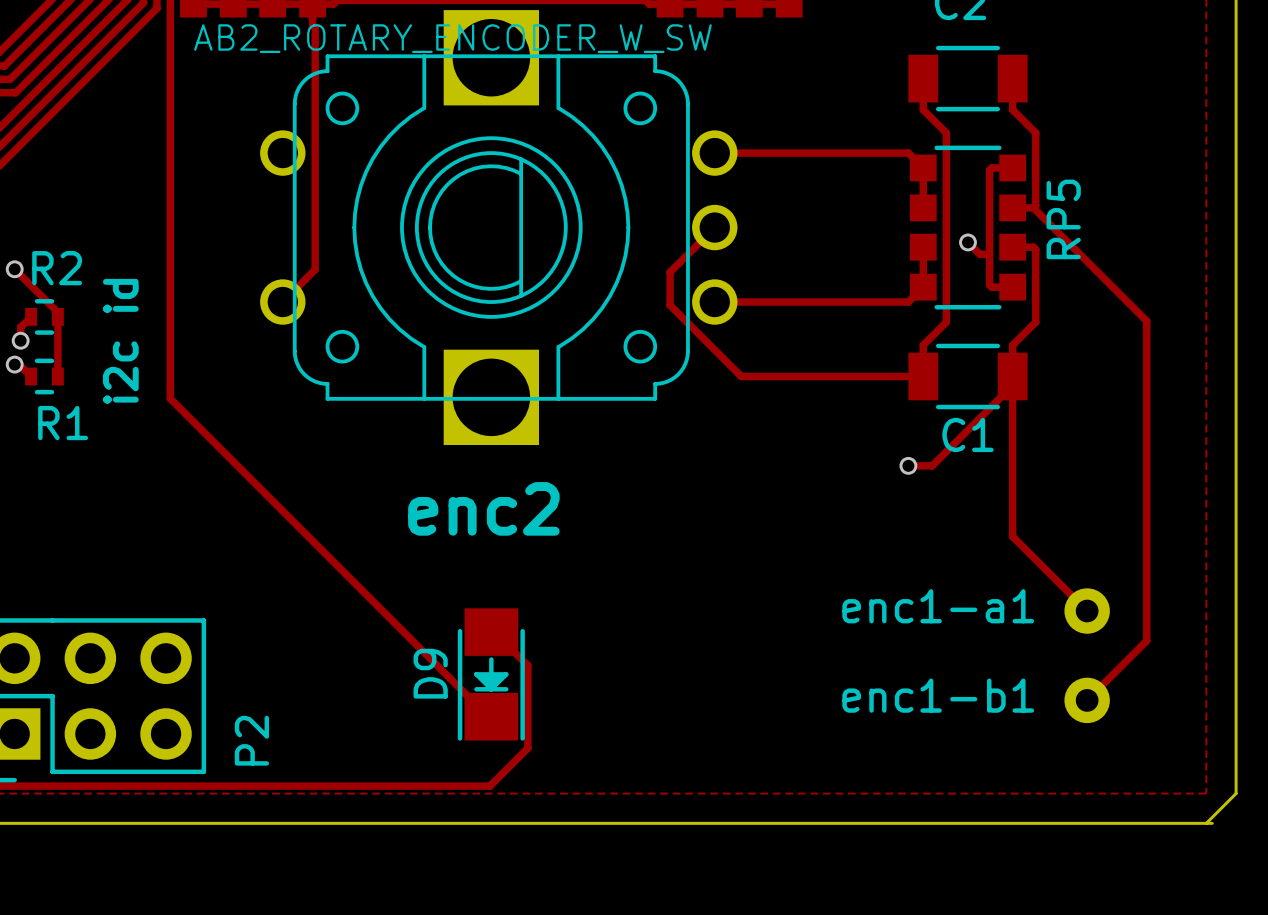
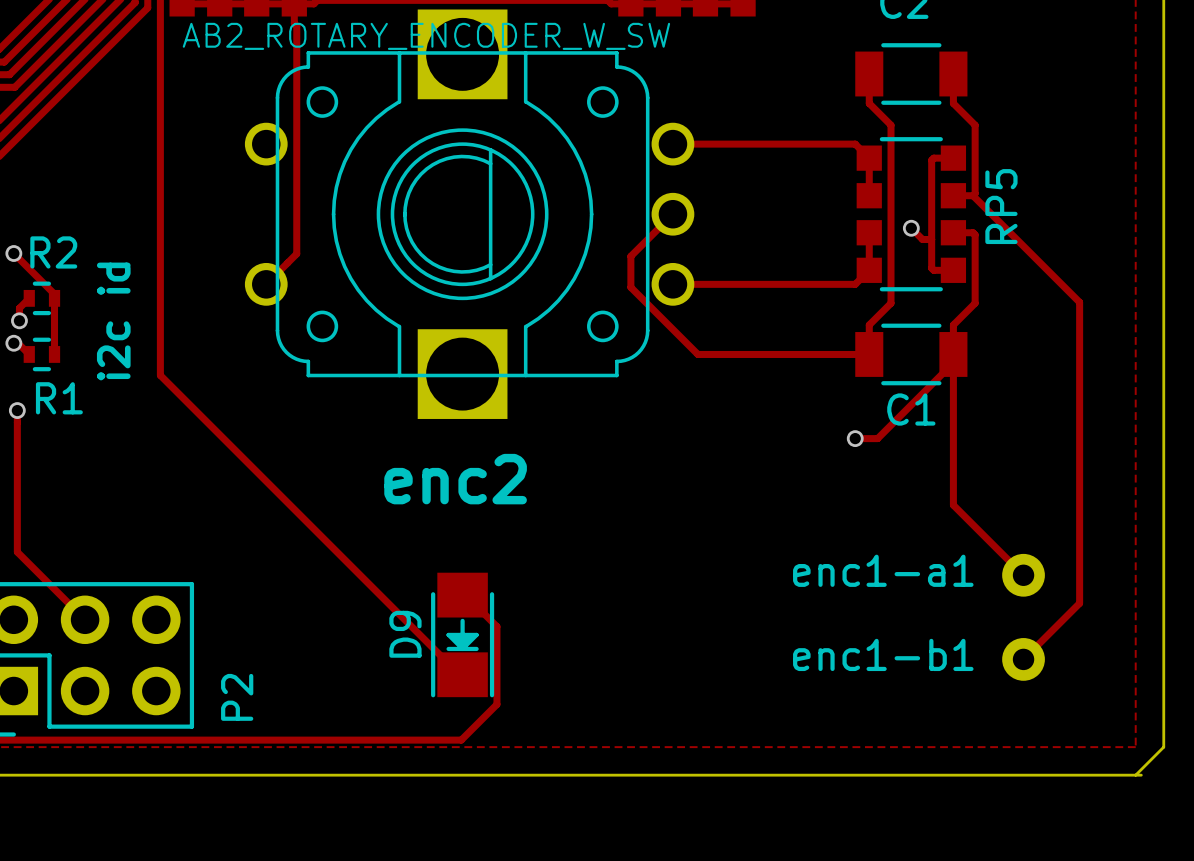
track: none -> (17, 410) (17, 552) (85, 619)
via: none -> (17, 410)

